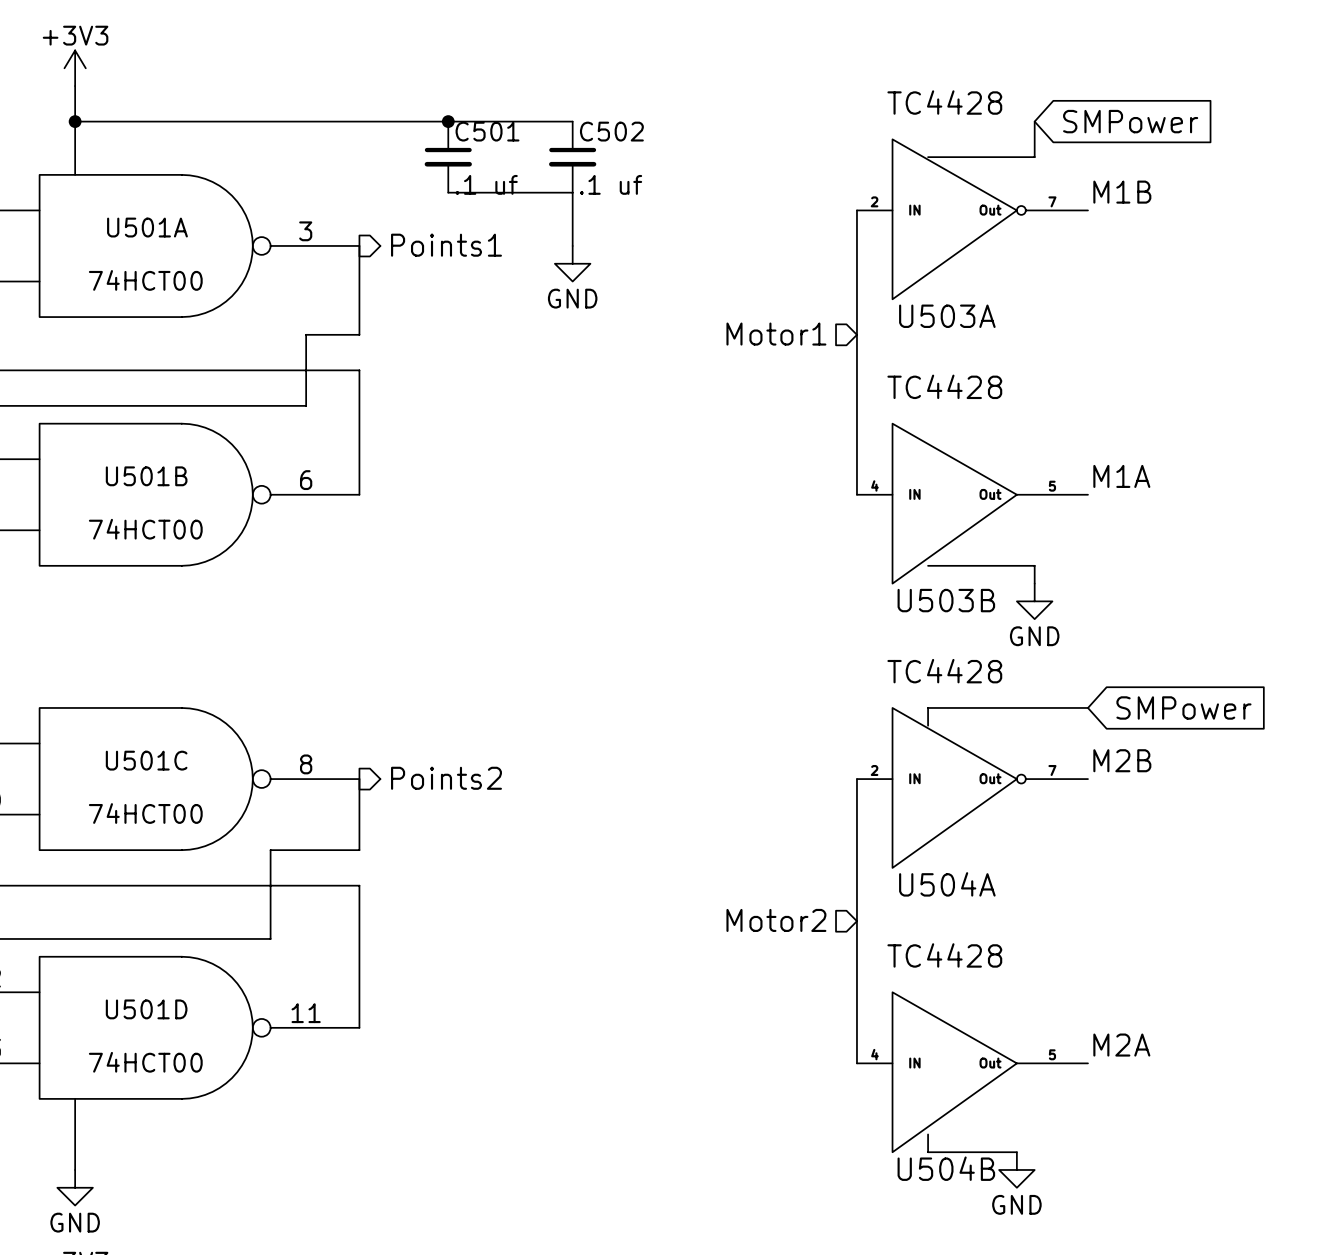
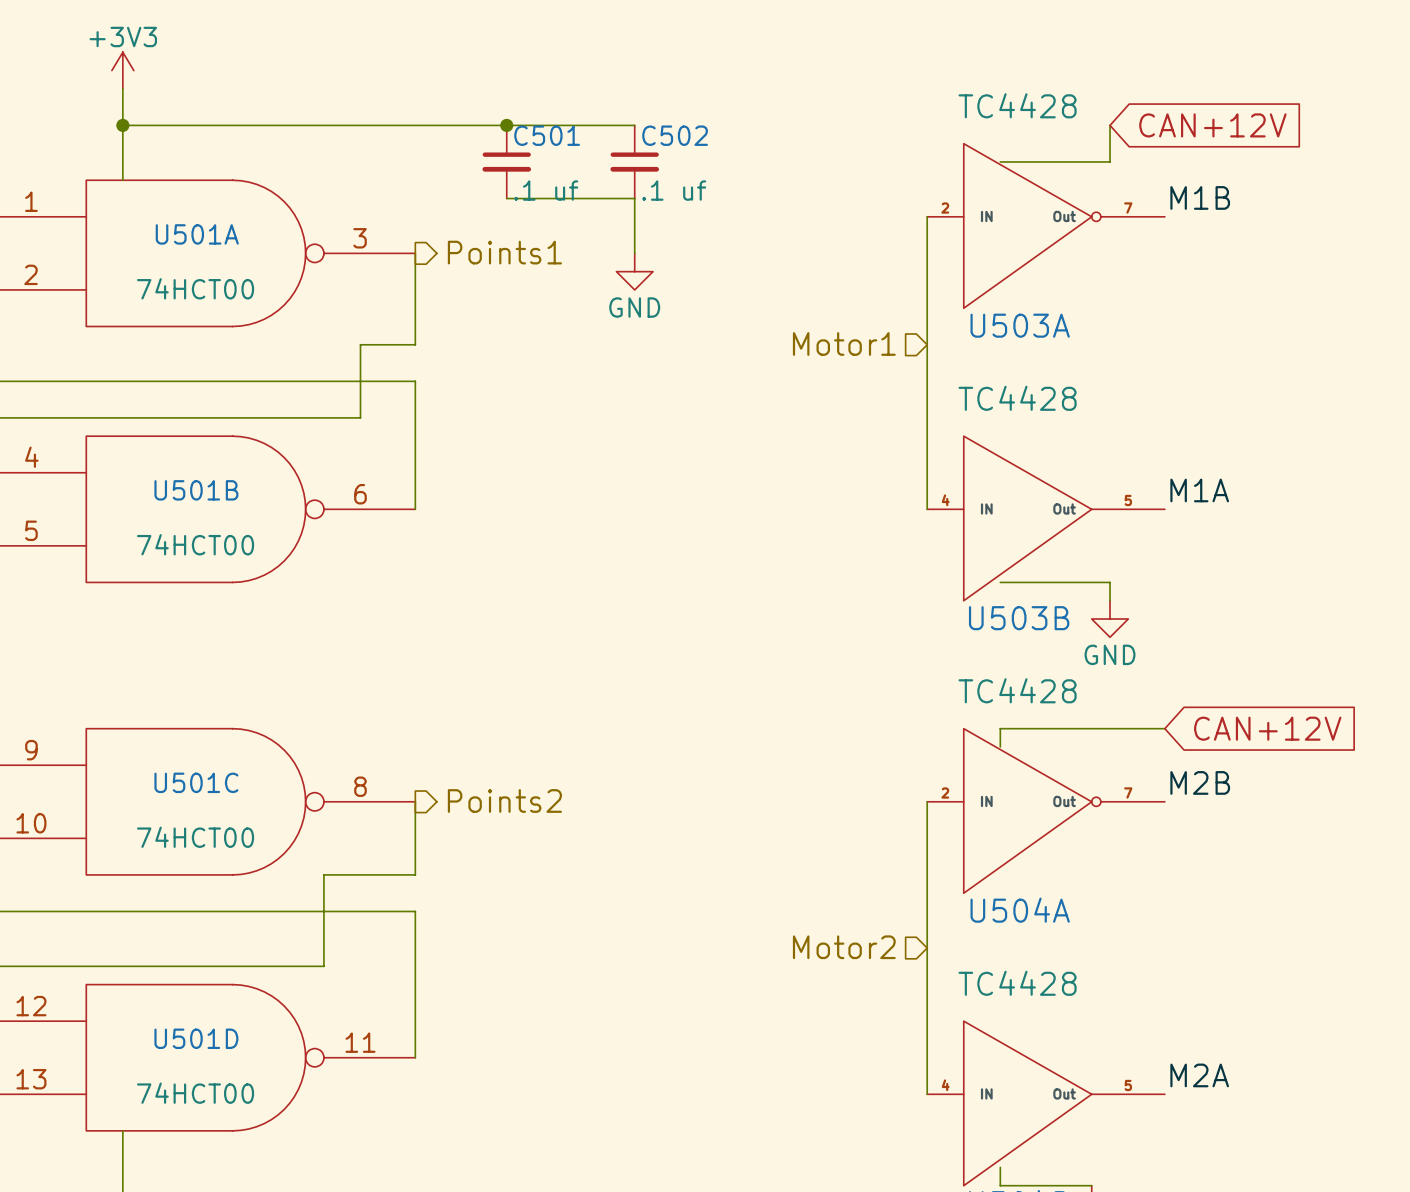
global label: SMPower (1130, 121) -> CAN+12V (1212, 125)
global label: SMPower (1183, 707) -> CAN+12V (1267, 728)

